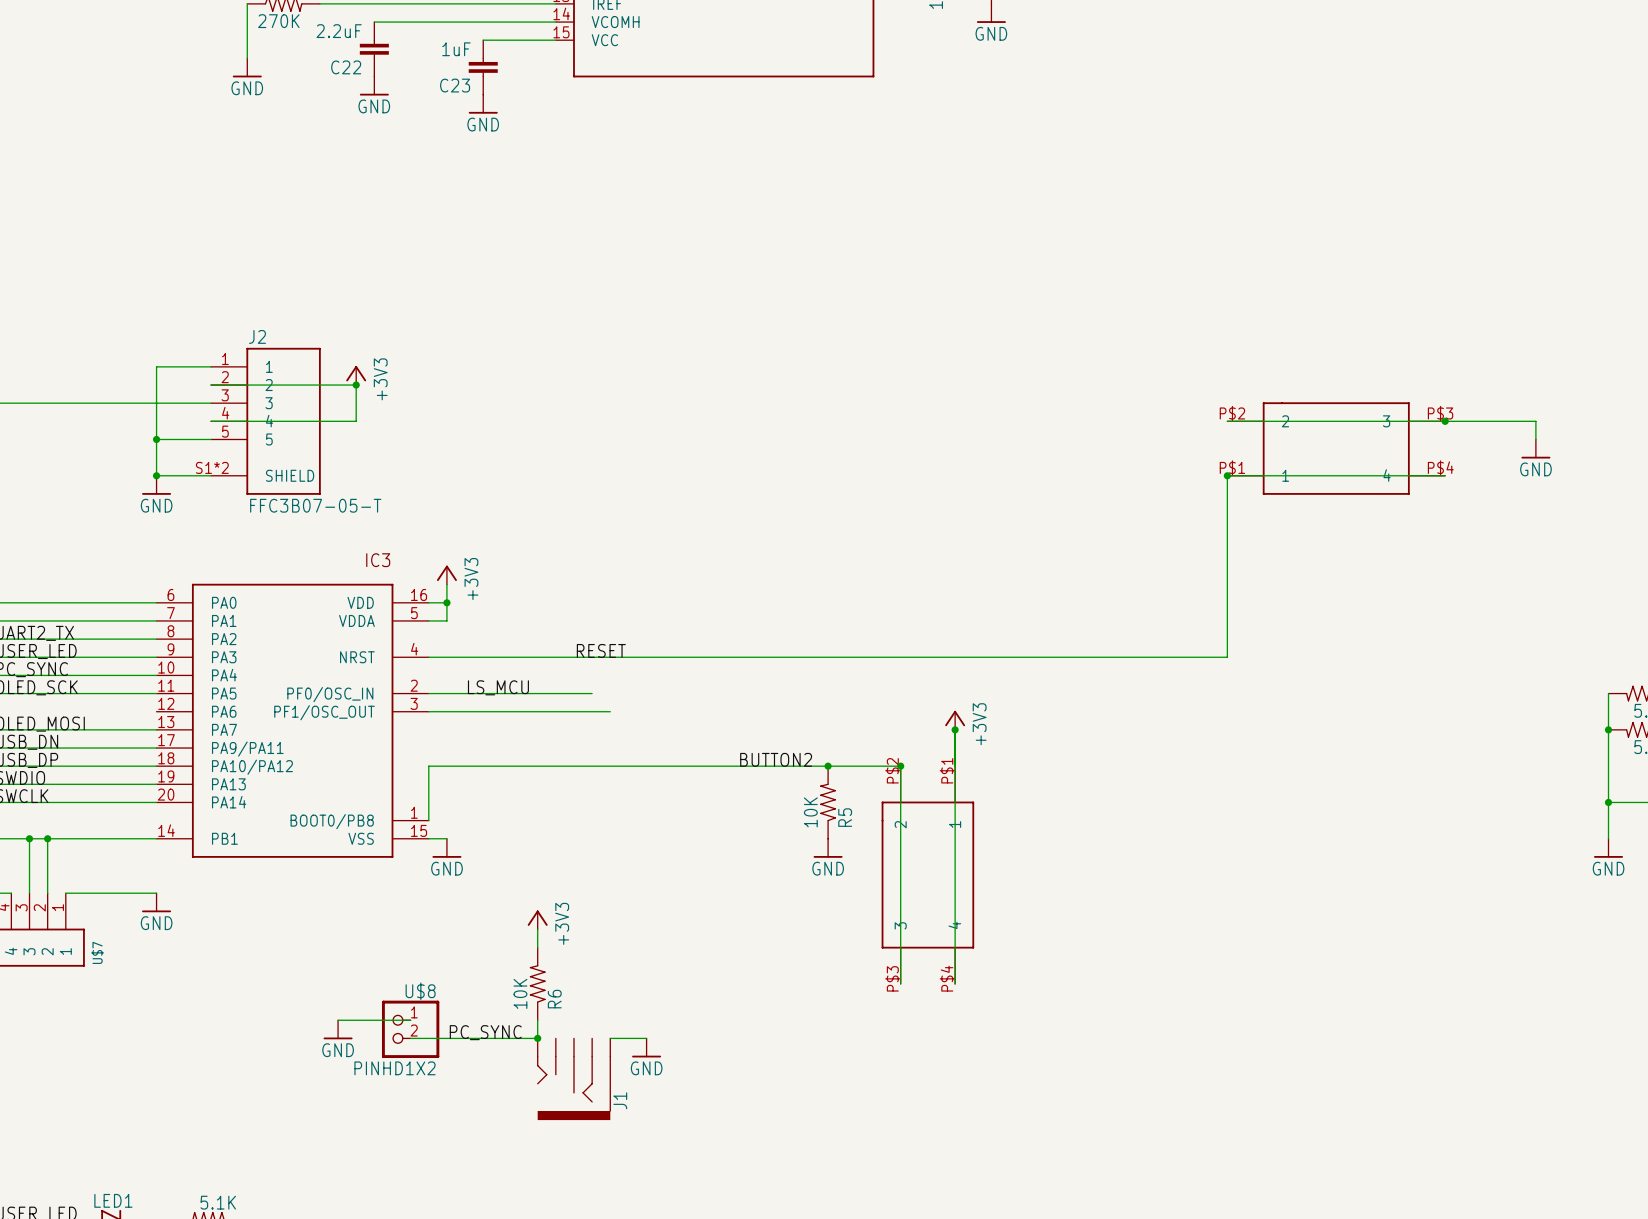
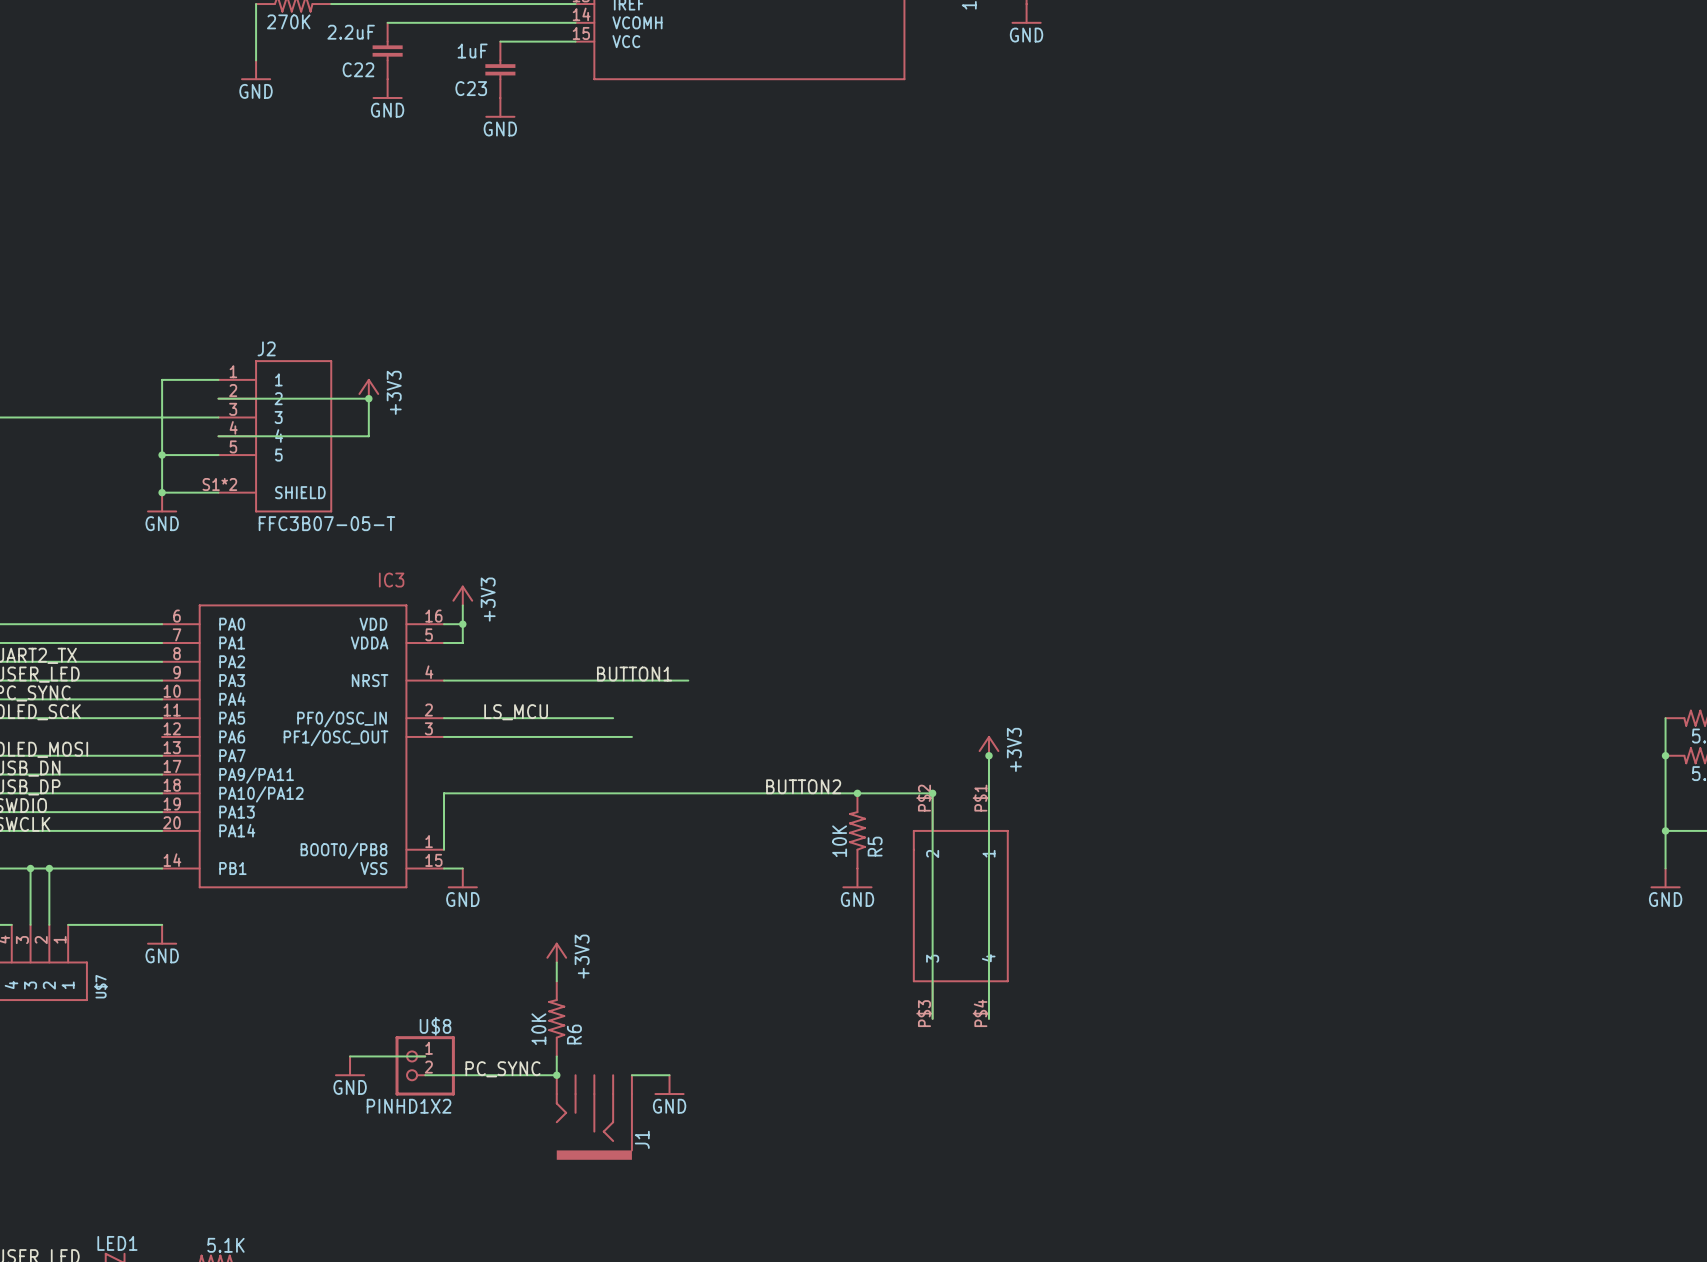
wire: (1227, 421) (1535, 421) (1535, 439) -> none
junction: (1445, 421) -> none
part: (1336, 448) -> none
power symbol: GND (1535, 449) -> none
junction: (1227, 475) -> none
wire: (1445, 475) (1227, 475) (1227, 657) (664, 657) -> none
label: RESET (601, 650) -> BUTTON1 (634, 674)

